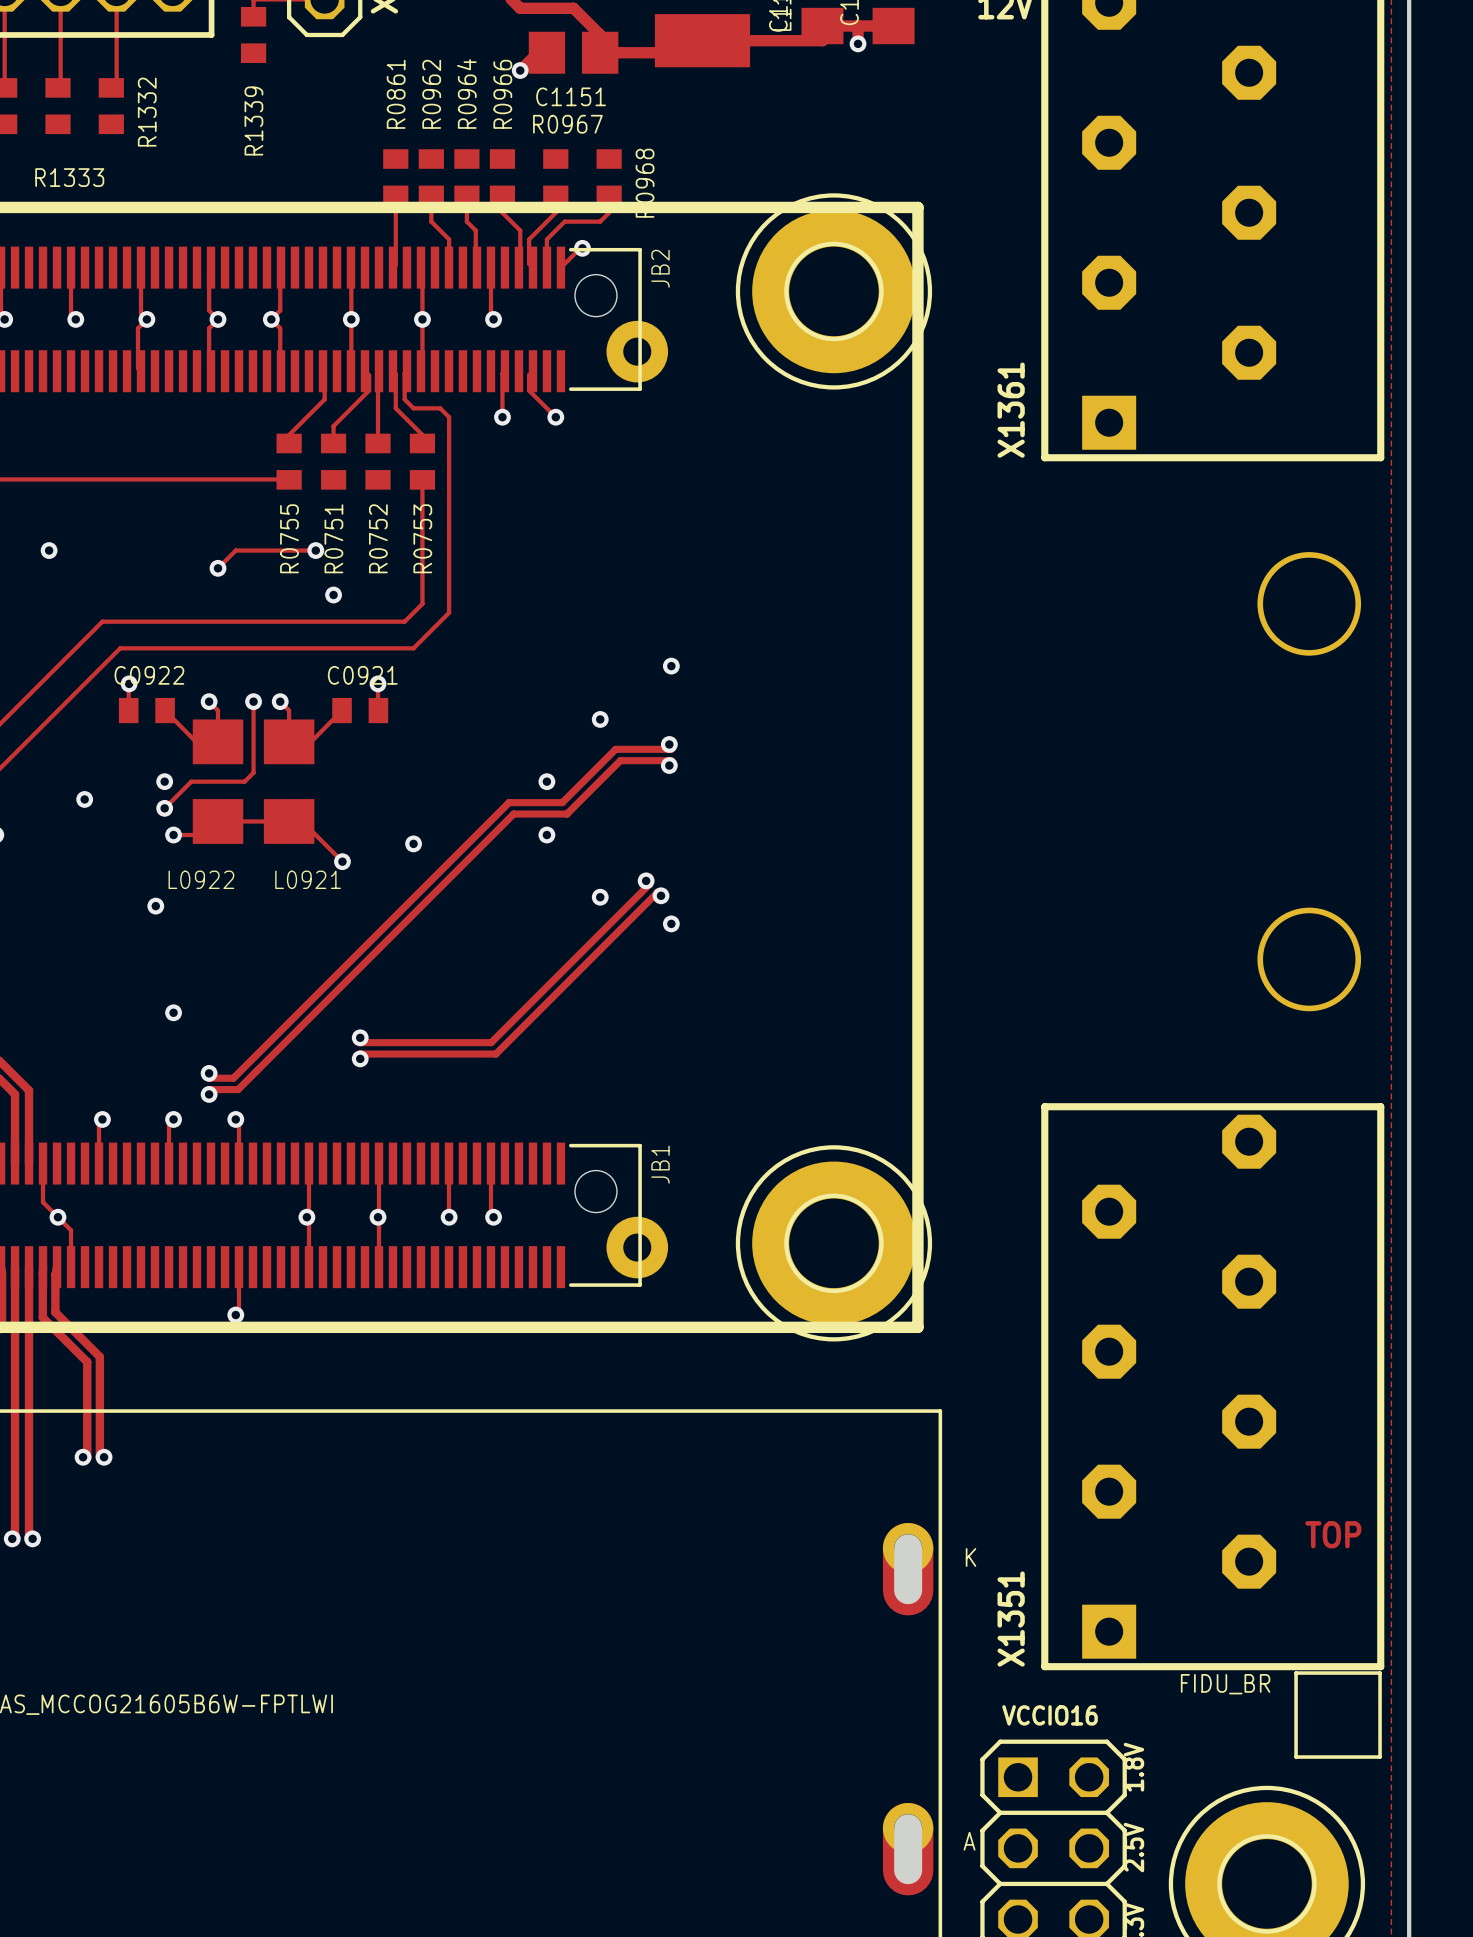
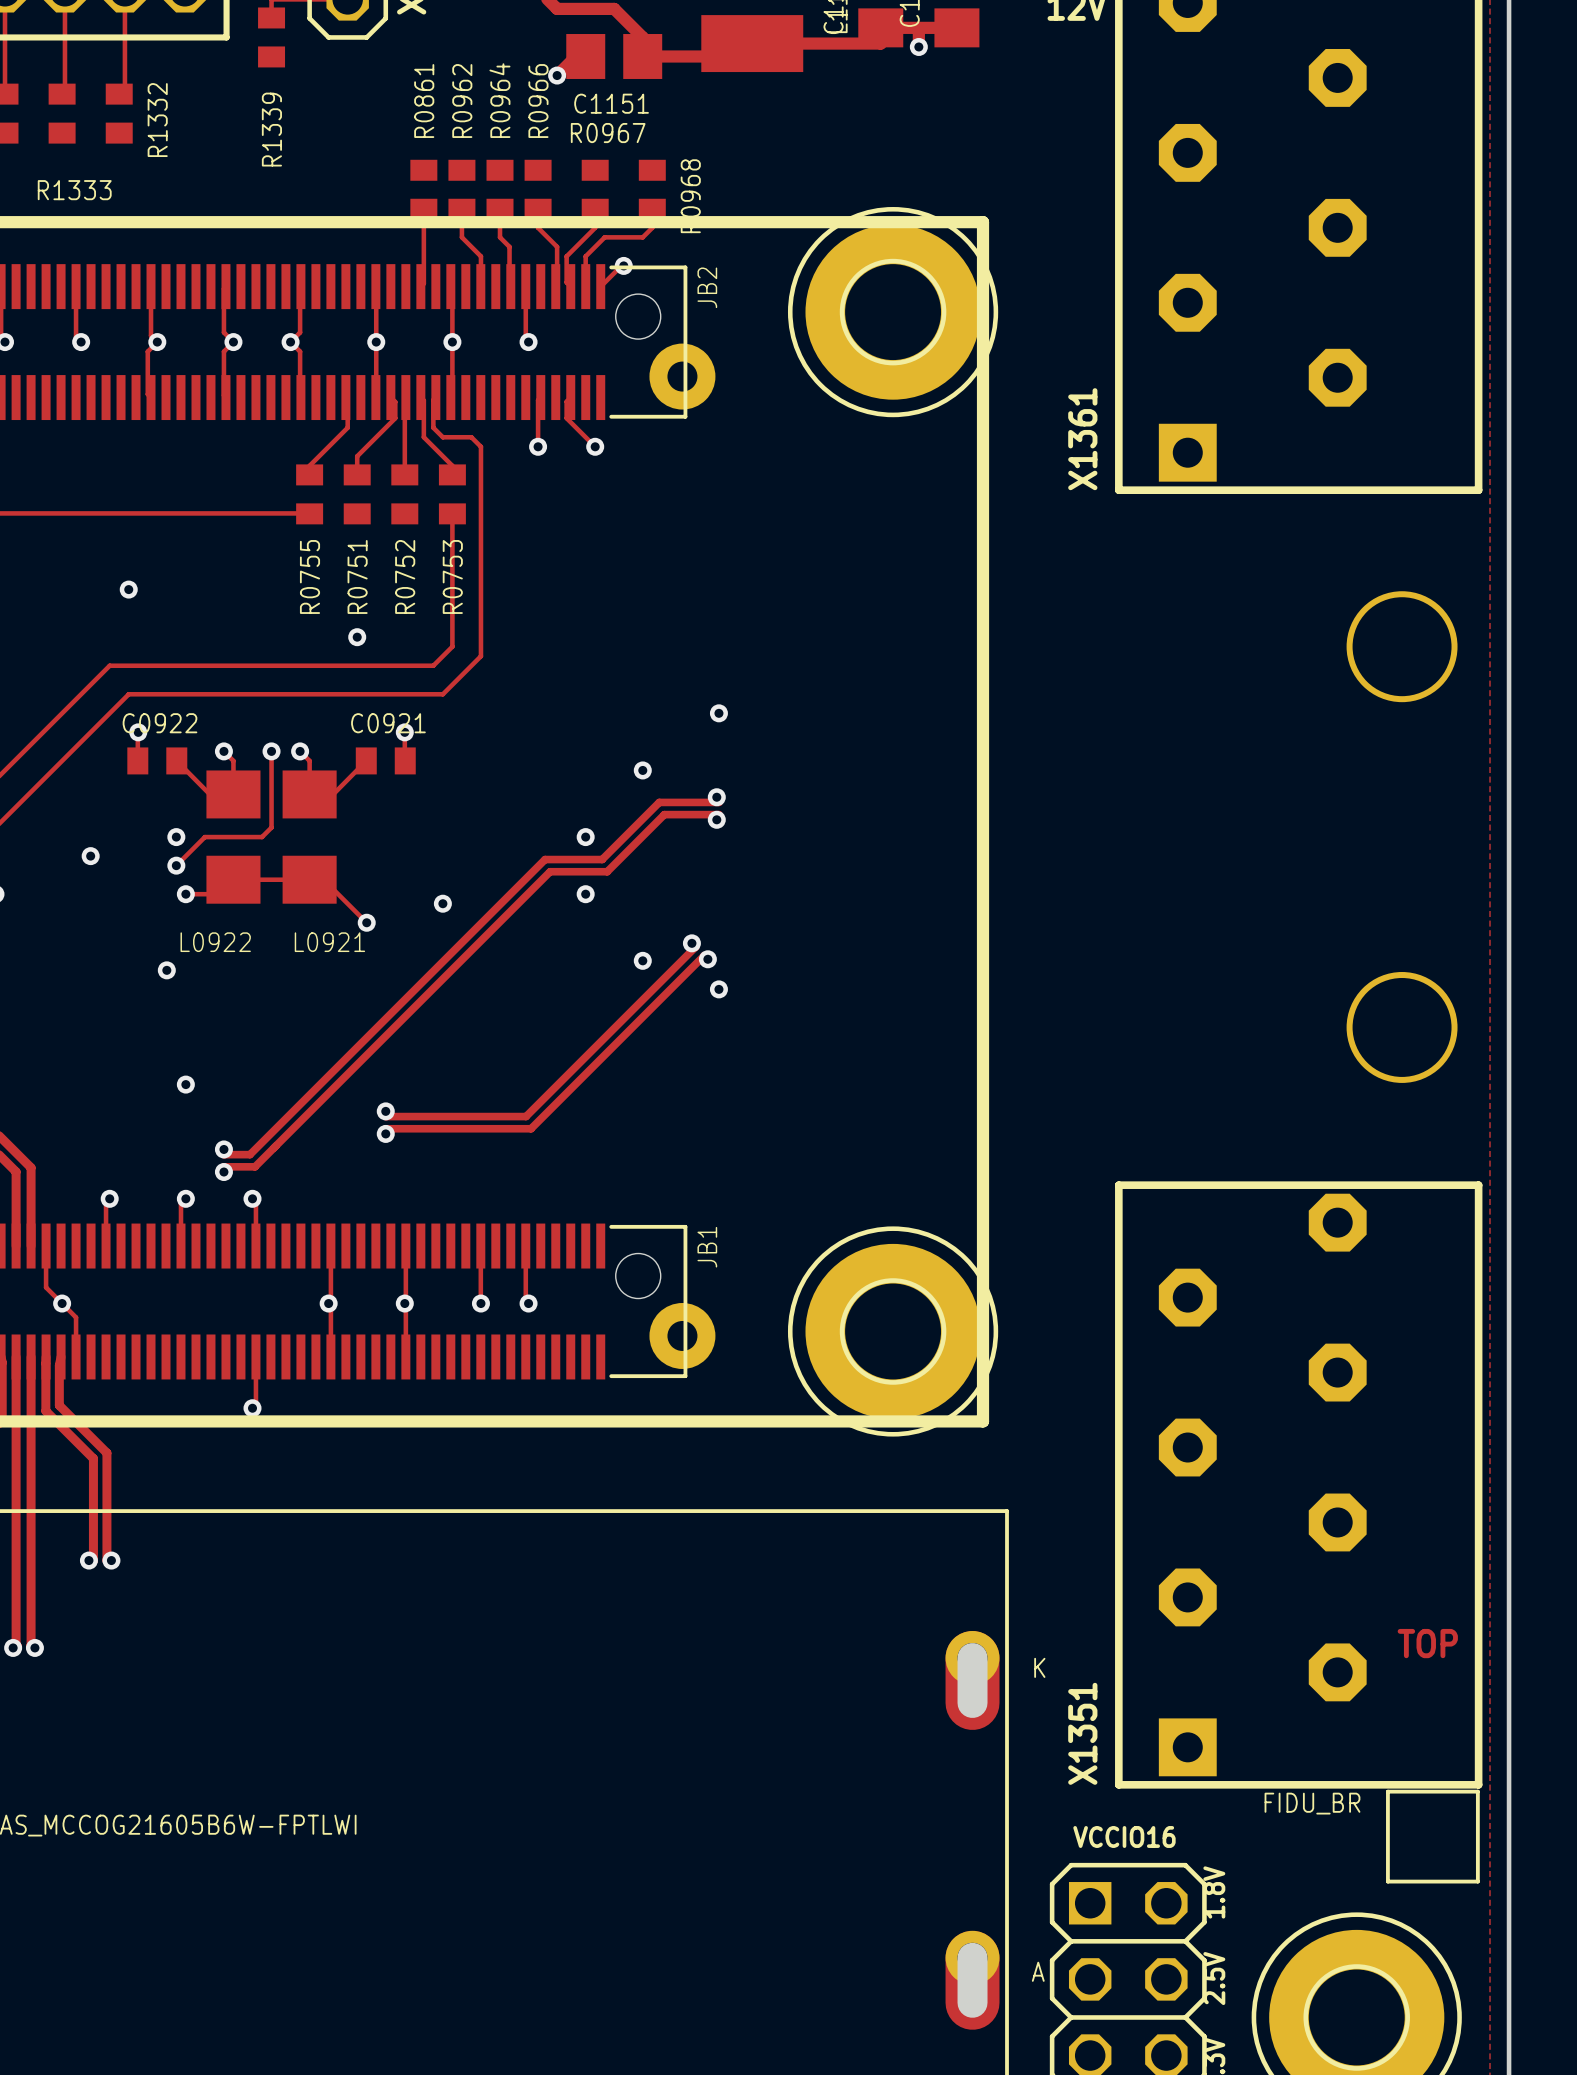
via: (49, 550) -> none
via: none -> (128, 589)
track: (315, 550) (235, 550) (218, 568) -> none
via: (315, 550) -> none
via: (218, 568) -> none

